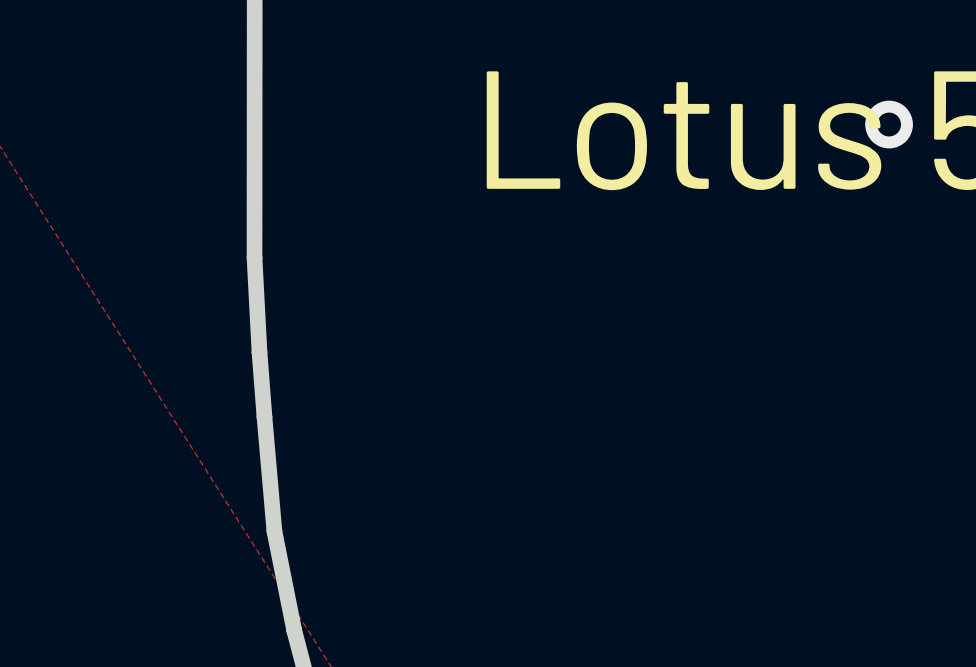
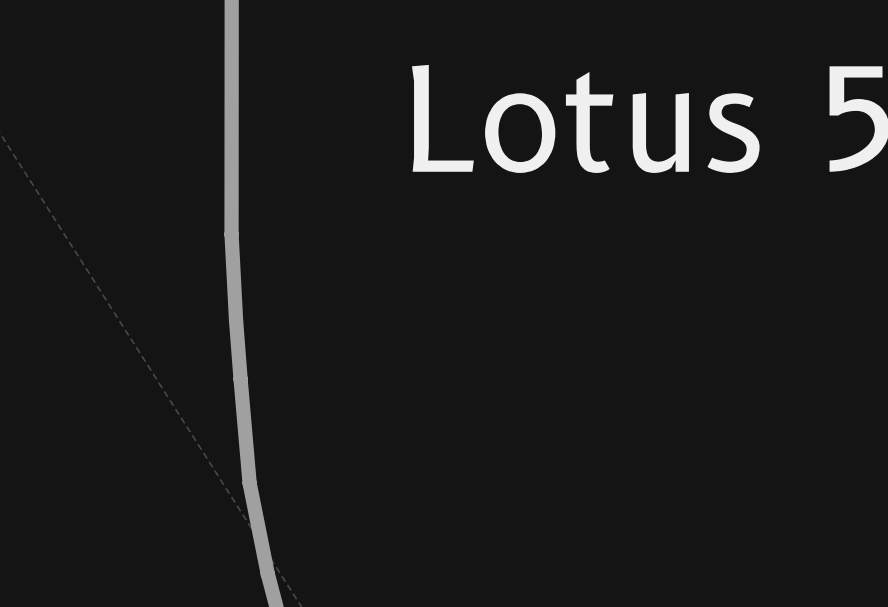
via: (889, 124) -> none

